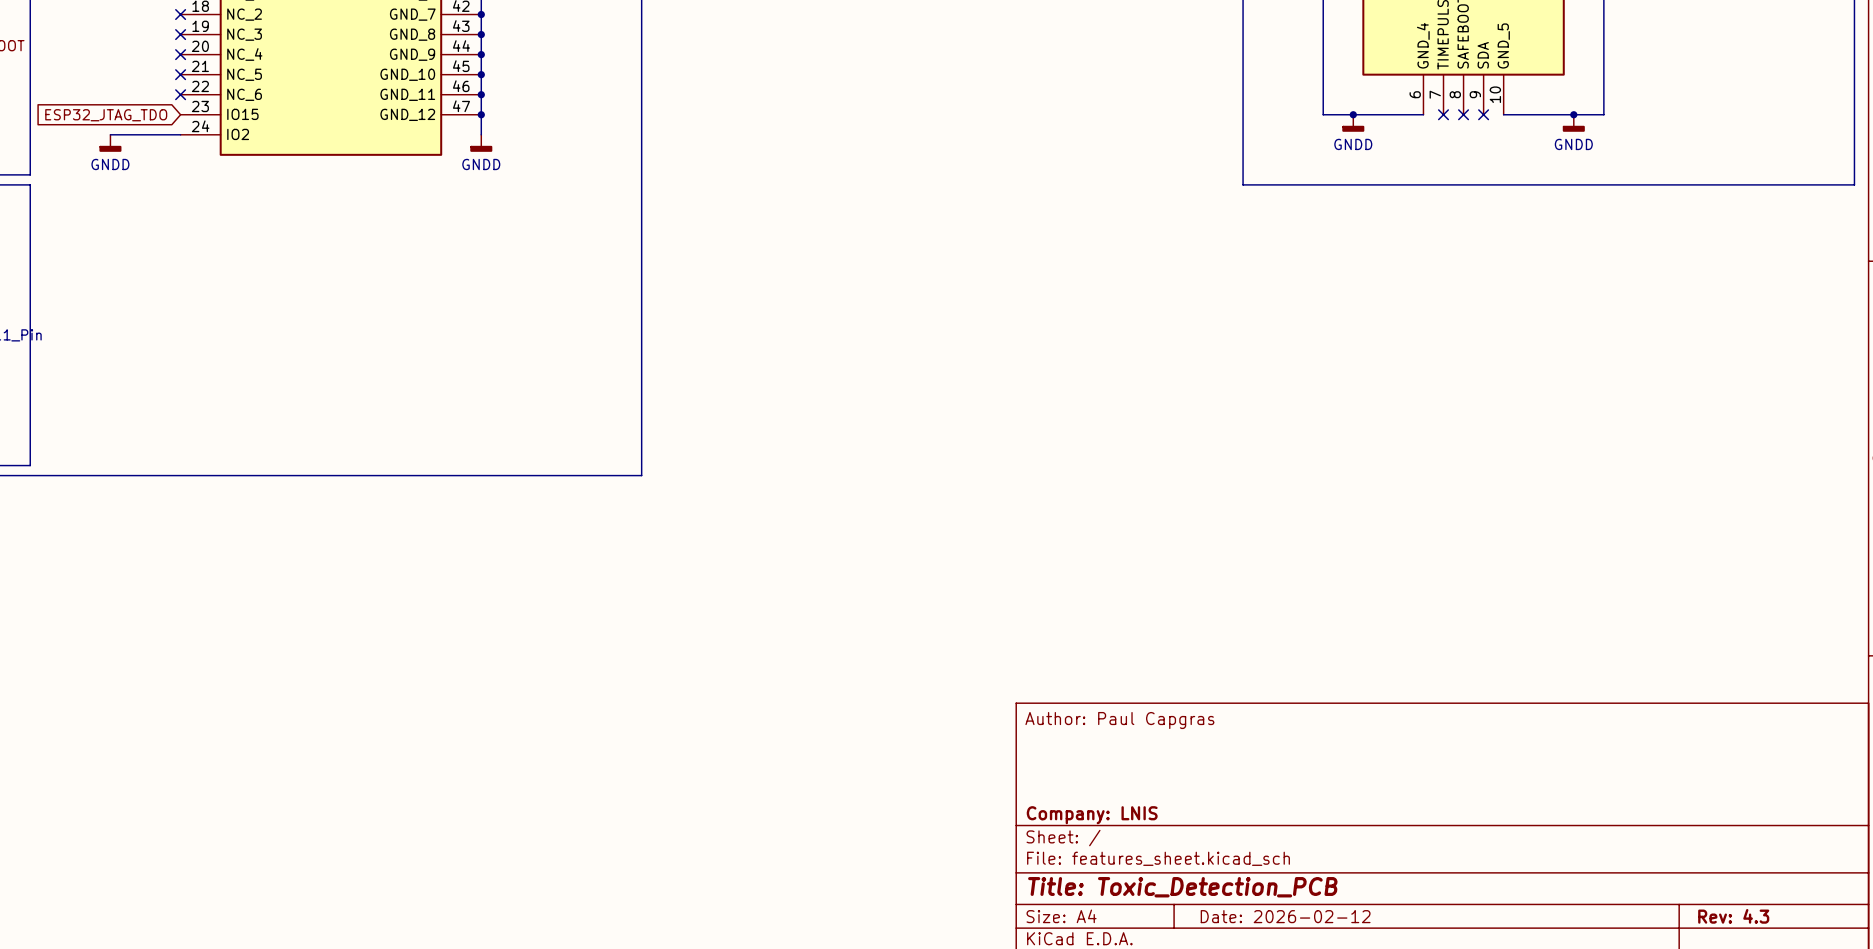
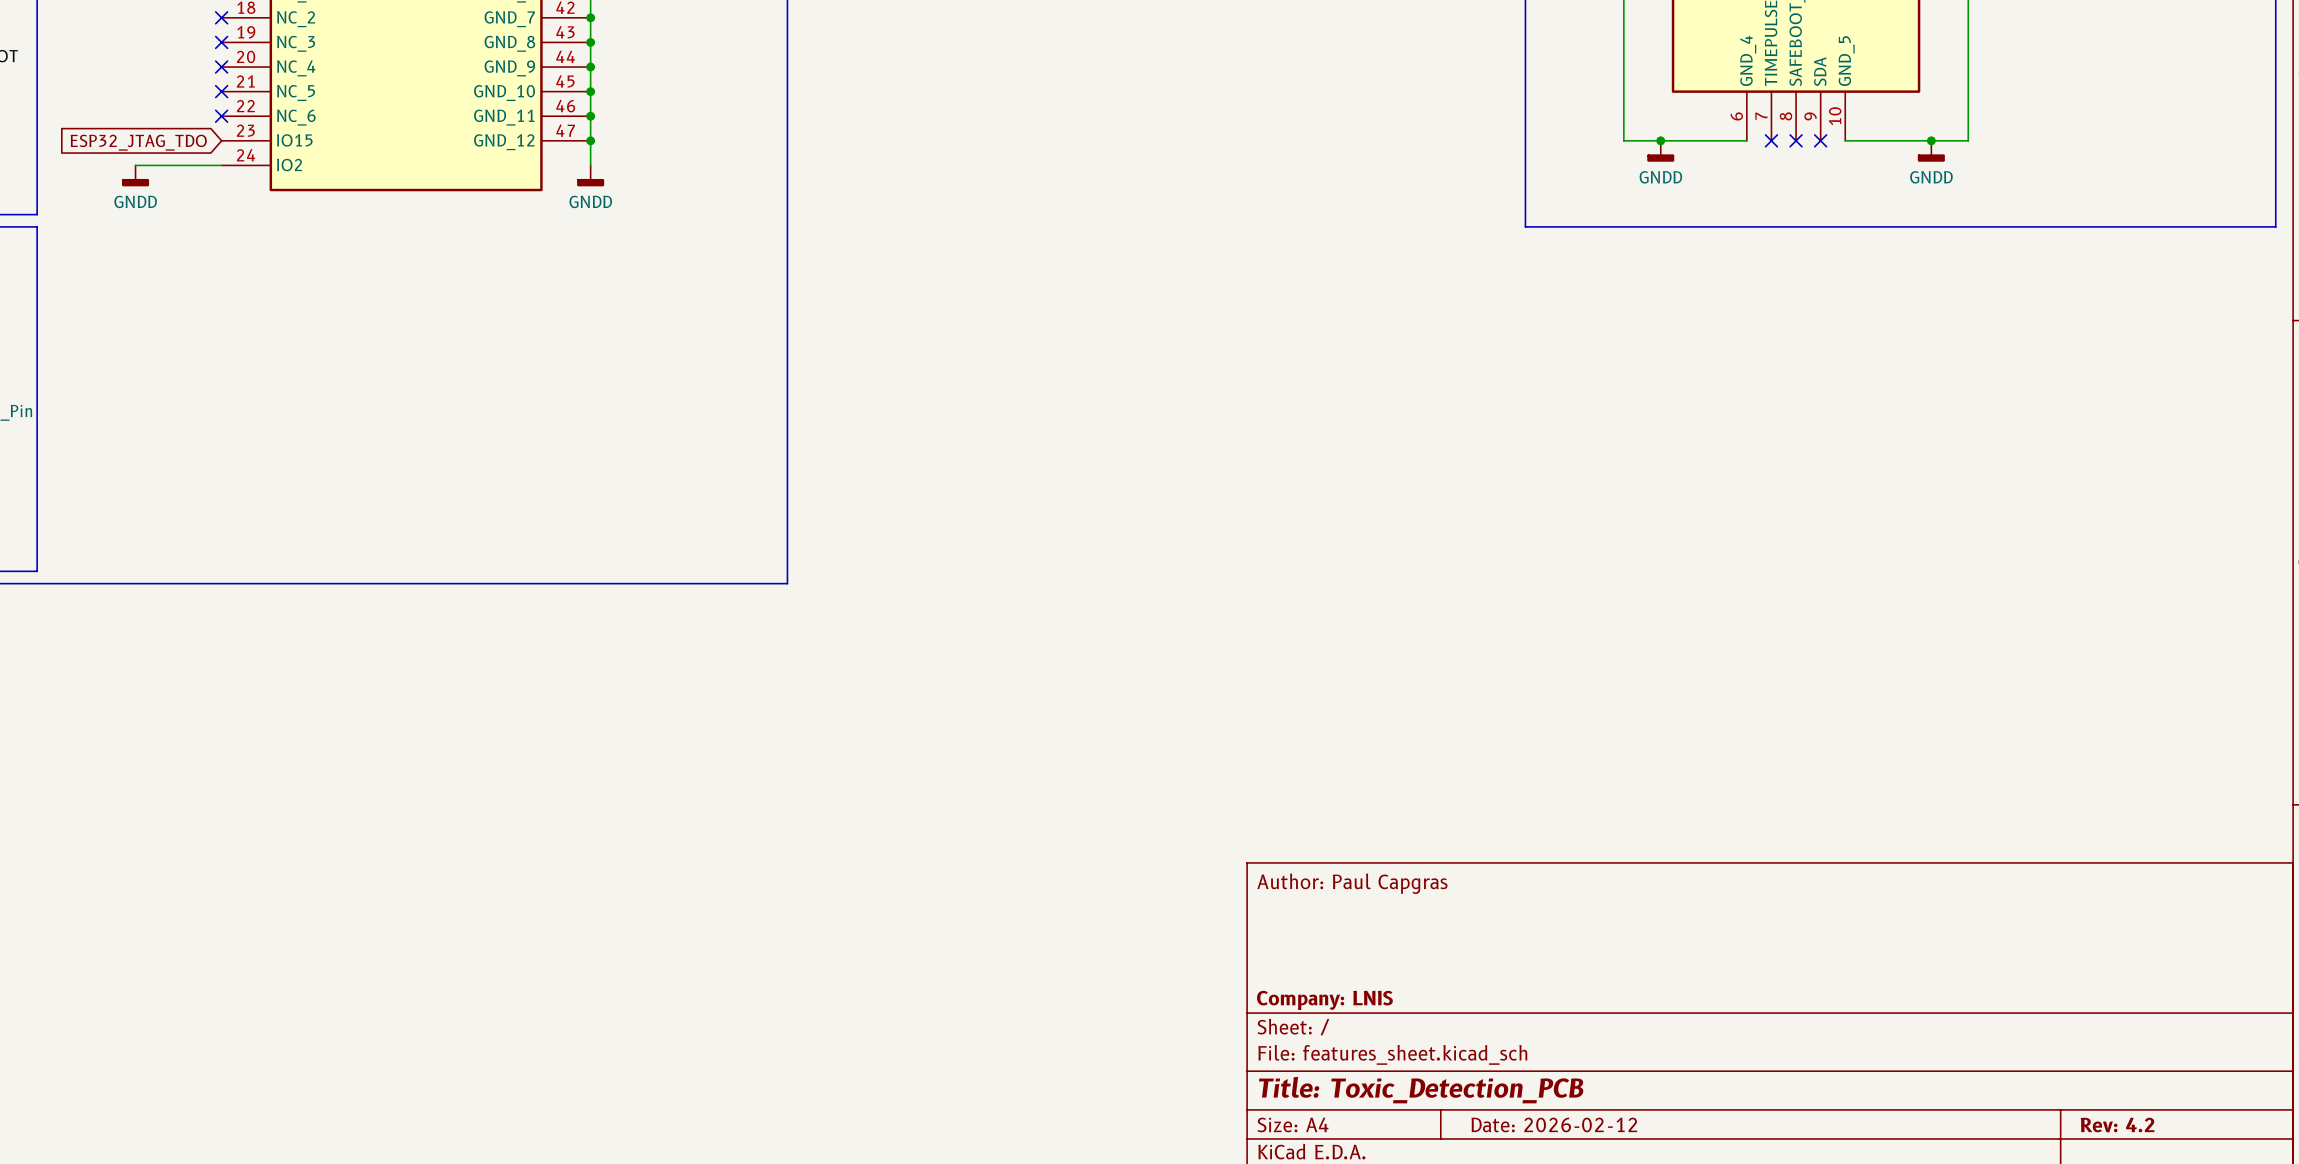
title block: Rev: 4.3 (1733, 916) -> Rev: 4.2 (2117, 1125)

